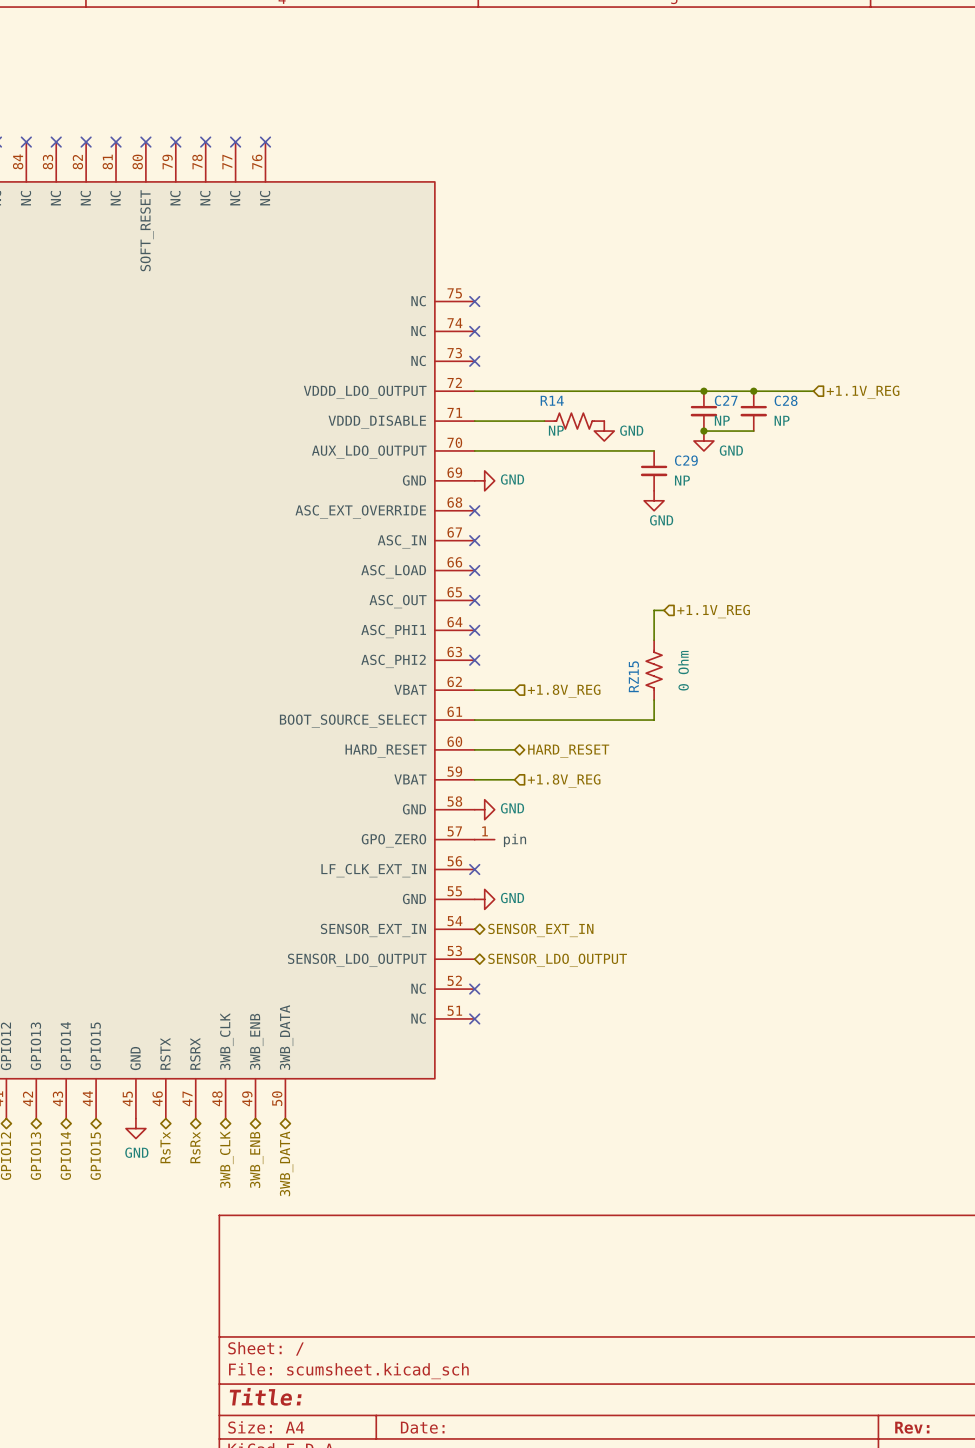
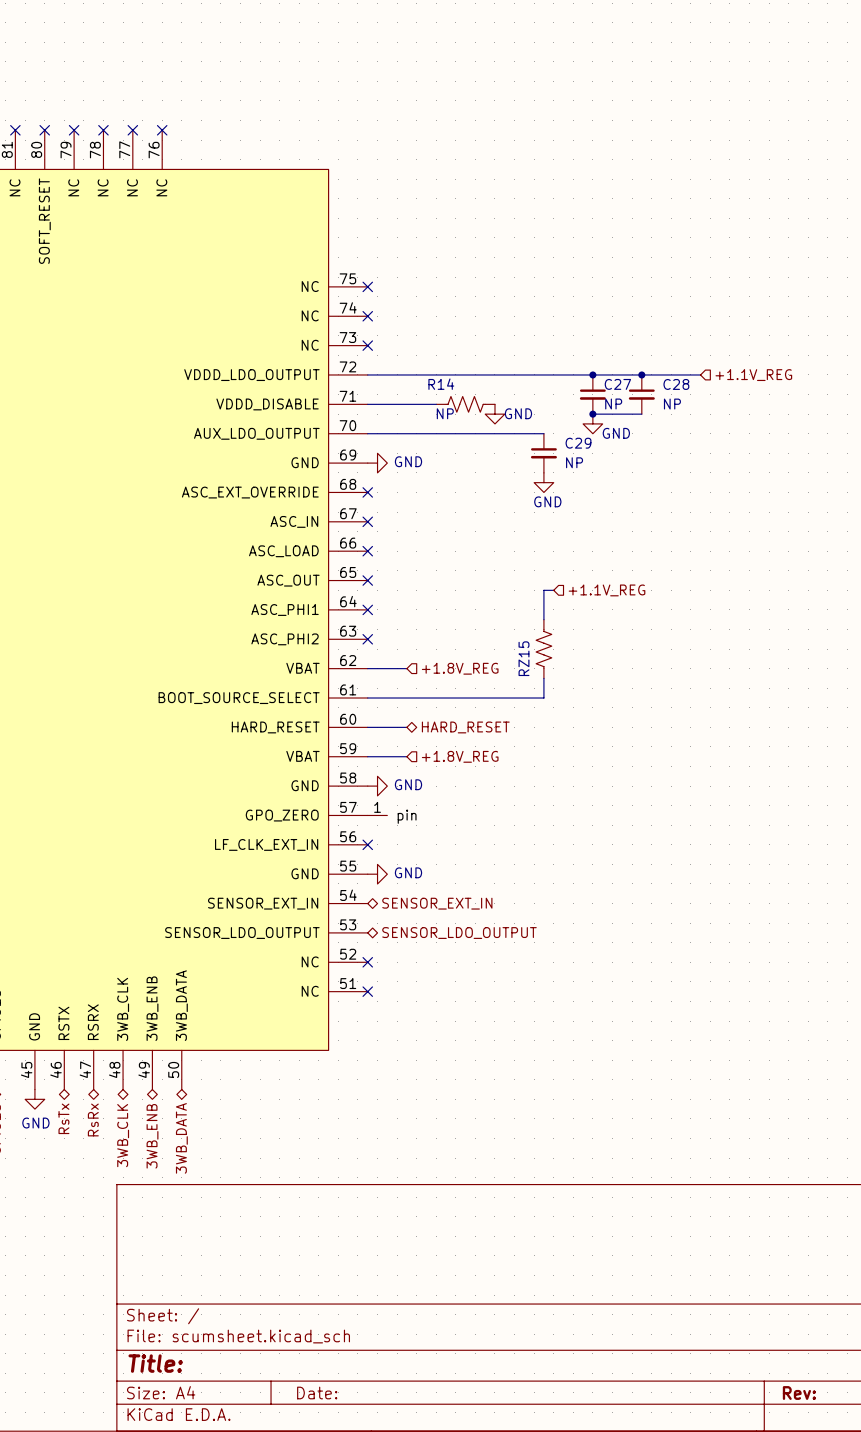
RZ15 value: 0 Ohm (683, 670) -> none

